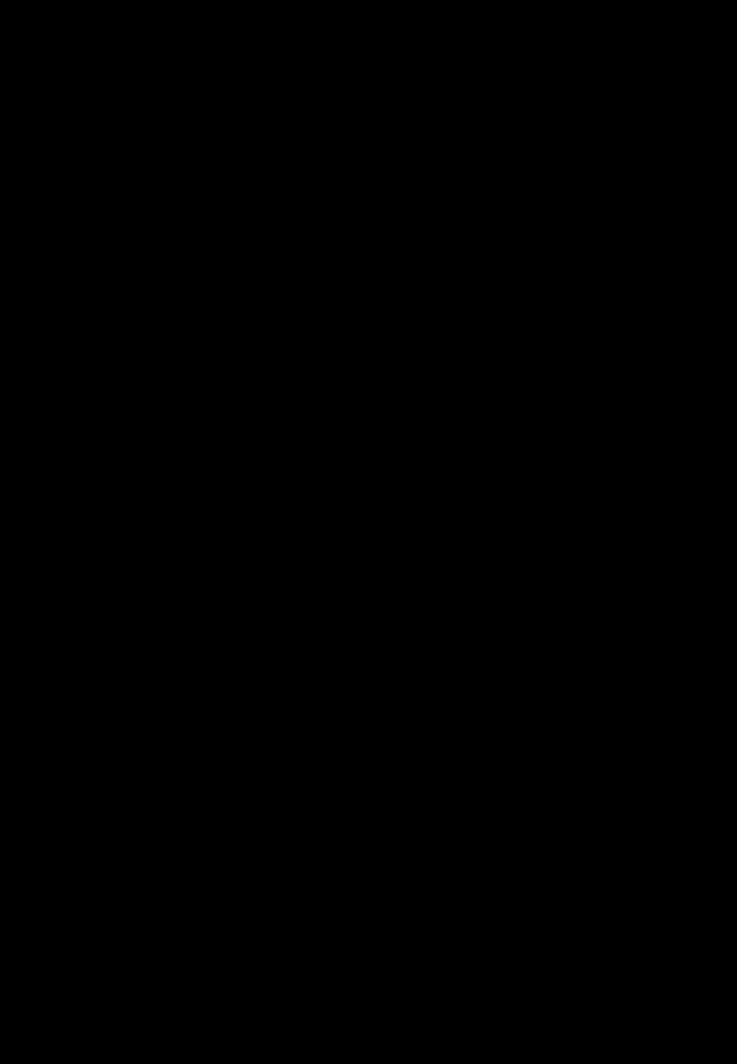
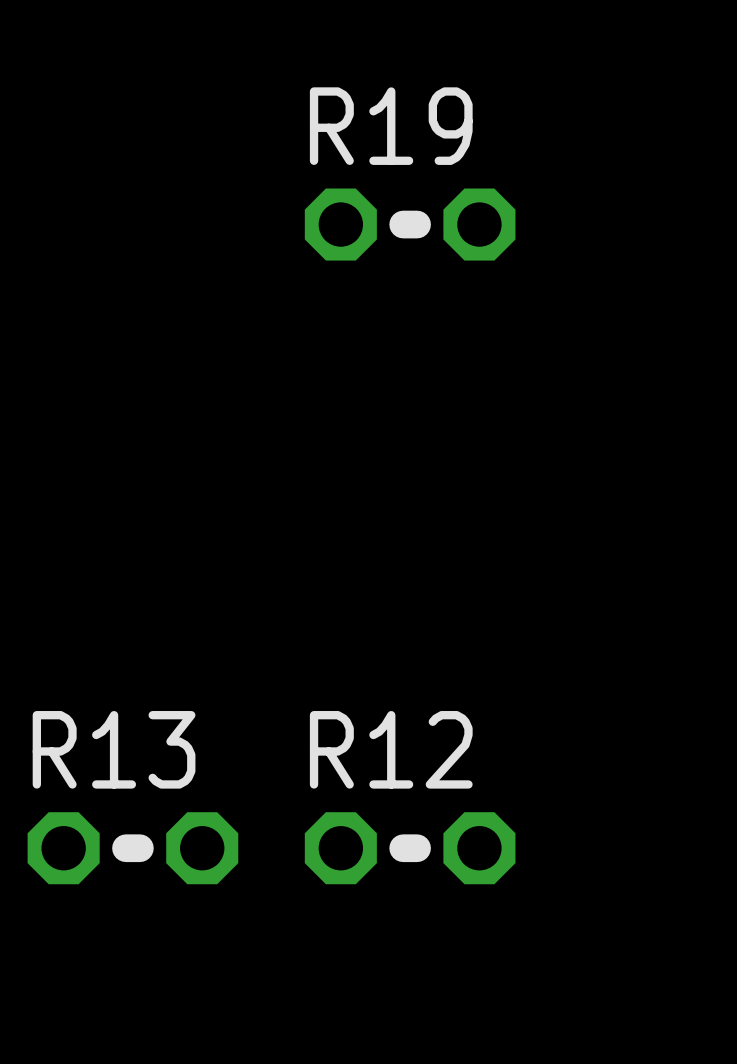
R19: none -> (410, 224)
R13: none -> (132, 848)
R12: none -> (410, 848)

